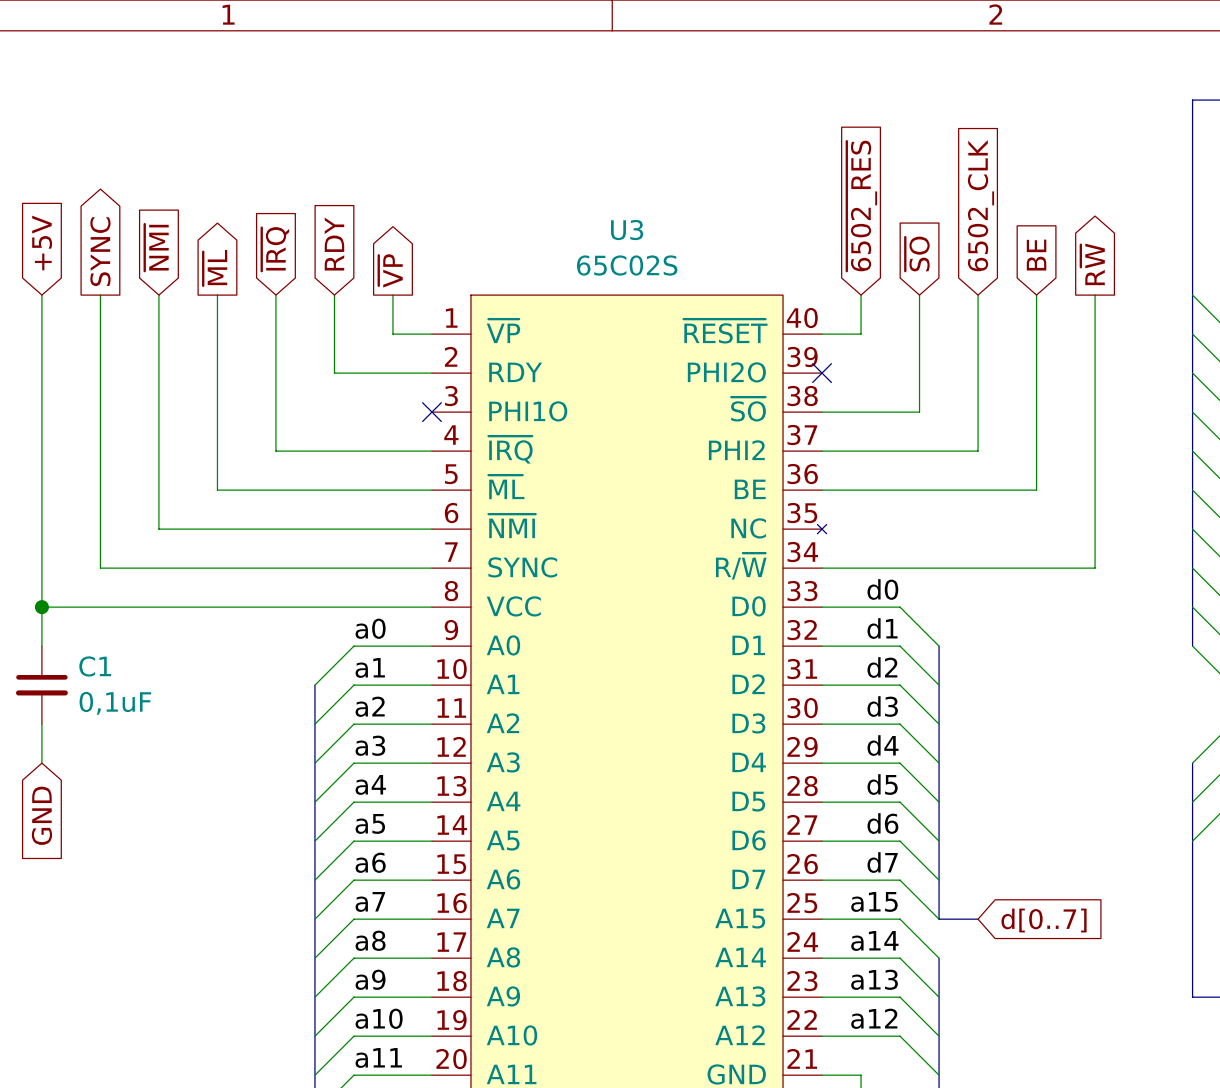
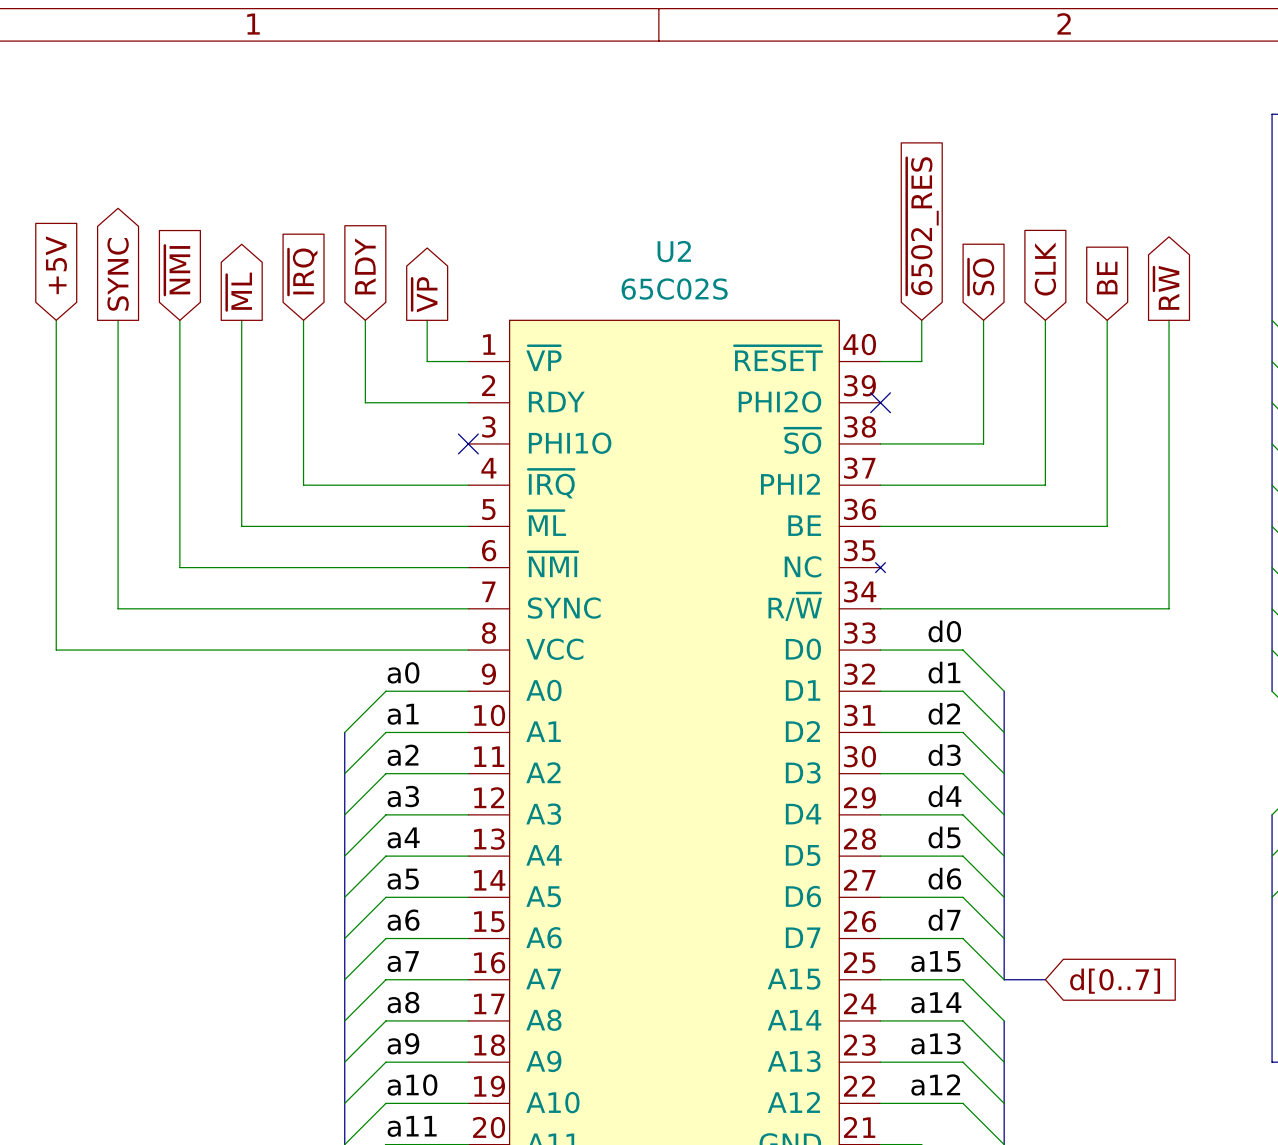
global label: 6502_CLK (981, 205) -> CLK (1045, 269)
U3 name: U3 (627, 230) -> U2 (674, 251)
wire: (41, 607) (41, 646) -> none
junction: (41, 607) -> none
C1: 0,1uF (41, 685) -> none
wire: (41, 724) (41, 763) -> none
global label: GND (41, 815) -> none

